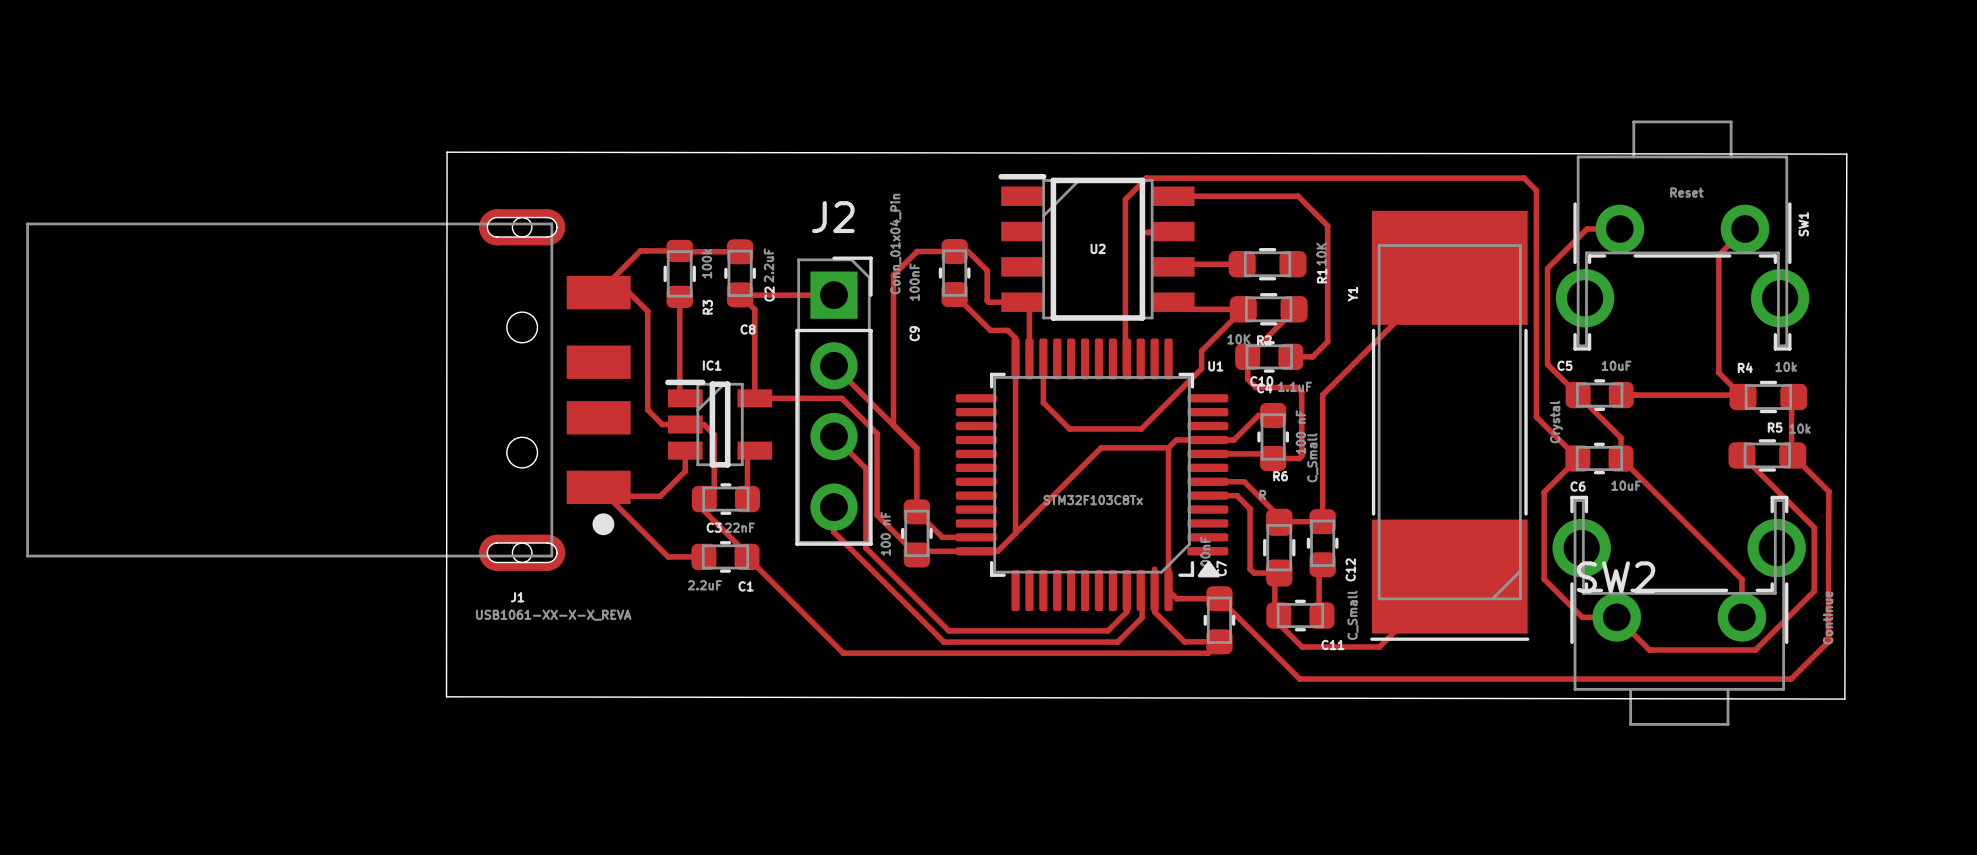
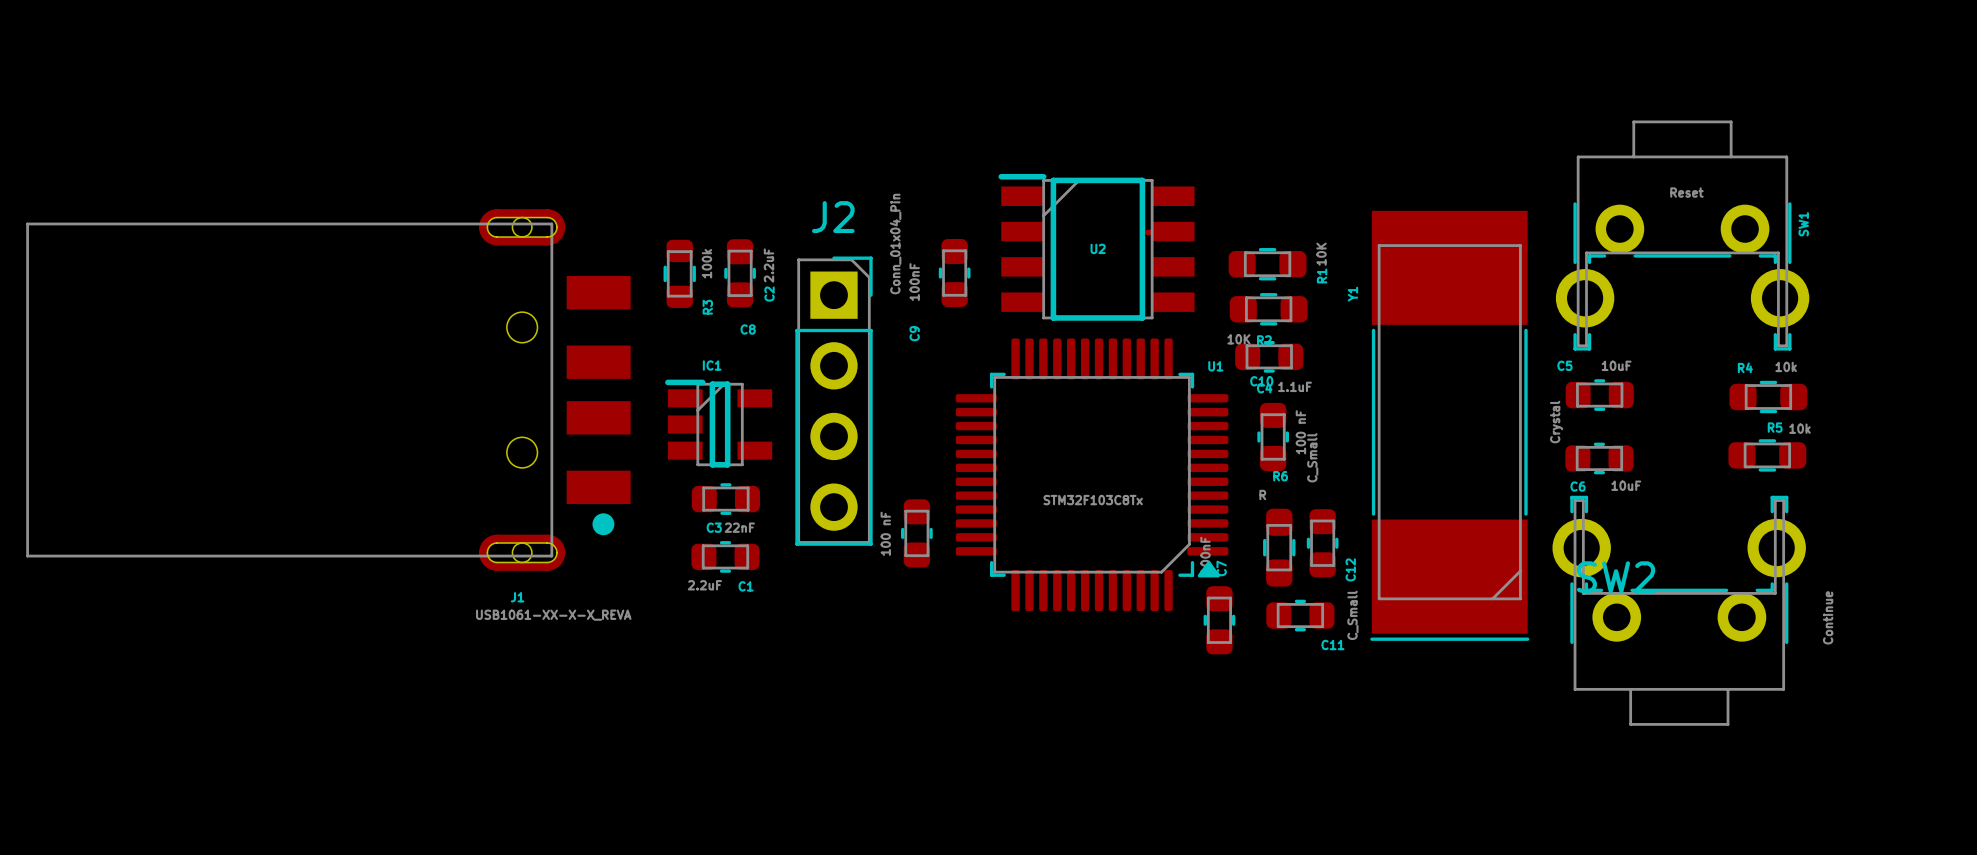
board edge: (447, 152) (1846, 154) (1844, 699) (446, 696) (447, 152) -> none
track: (1173, 196) (1298, 196) (1327, 225) (1327, 341) (1312, 356) (1290, 356) -> none
track: (1619, 229) (1587, 229) (1547, 268) (1547, 364) (1620, 437) (1620, 458) -> none
track: (1745, 229) (1718, 255) (1718, 372) (1743, 397) (1736, 395) (1621, 395) -> none
track: (680, 251) (740, 251) -> none
track: (682, 253) (679, 250) (640, 250) (598, 292) (629, 292) (647, 311) (647, 409) (662, 424) (703, 424) (714, 434) (714, 489) (704, 499) (704, 511) (843, 653) (1208, 653) (1219, 641) (1184, 641) (1154, 611) (1154, 569) -> none
track: (1242, 264) (1175, 264) (1173, 266) -> none
track: (1449, 267) (1322, 394) (1322, 521) (1279, 522) (1279, 516) (1244, 481) (1208, 482) -> none
track: (740, 294) (754, 309) (754, 398) -> none
track: (954, 294) (990, 330) (1007, 330) (1015, 338) (1015, 533) -> none
track: (740, 295) (833, 295) -> none
track: (679, 296) (679, 392) (685, 398) -> none
track: (1173, 302) (1178, 302) (1185, 309) (1243, 309) (1201, 351) (1201, 368) (1141, 428) (1069, 428) (1043, 402) (1043, 359) -> none
track: (1294, 309) (1247, 356) (1247, 379) (1255, 387) (1297, 387) (1301, 392) (1301, 456) (1299, 458) (1273, 458) (1268, 453) (1207, 453) -> none
track: (1028, 357) (1029, 359) (1029, 309) (1022, 302) (988, 302) (987, 300) (987, 270) (968, 251) (917, 251) (893, 275) (893, 425) -> none
track: (833, 365) (916, 448) (916, 511) (942, 537) (976, 537) -> none
track: (1125, 369) (1125, 199) (1146, 178) (1524, 178) (1536, 190) (1536, 417) (1577, 458) (1544, 492) (1544, 579) (1582, 617) (1616, 617) (1649, 650) (1755, 650) (1814, 591) (1814, 527) (1741, 455) -> none
track: (1791, 393) (1791, 454) (1828, 491) (1828, 641) (1791, 679) (1299, 679) (1219, 598) (1176, 598) (1168, 590) (1168, 447) -> none
track: (754, 398) (841, 398) (877, 433) (877, 515) (916, 554) (920, 551) (997, 551) (1101, 447) (1168, 447) -> none
track: (1273, 415) (1258, 415) (1233, 440) (1176, 440) (1168, 447) -> none
track: (833, 436) (865, 468) (865, 548) (948, 630) (1107, 630) (1126, 611) (1126, 590) -> none
track: (685, 450) (685, 471) (660, 496) (629, 496) -> none
track: (754, 450) (747, 458) (747, 499) -> none
track: (1620, 458) (1741, 579) (1741, 617) -> none
track: (602, 487) (598, 487) (668, 556) (703, 556) -> none
track: (1207, 495) (1236, 495) (1250, 508) (1250, 569) (1254, 573) (1279, 573) (1274, 577) (1274, 611) (1278, 615) (1278, 623) (1302, 646) (1379, 646) (1449, 576) -> none
track: (833, 507) (833, 531) (943, 642) (1117, 642) (1142, 617) (1142, 591) -> none
track: (1322, 564) (1319, 568) (1319, 612) (1321, 615) -> none

